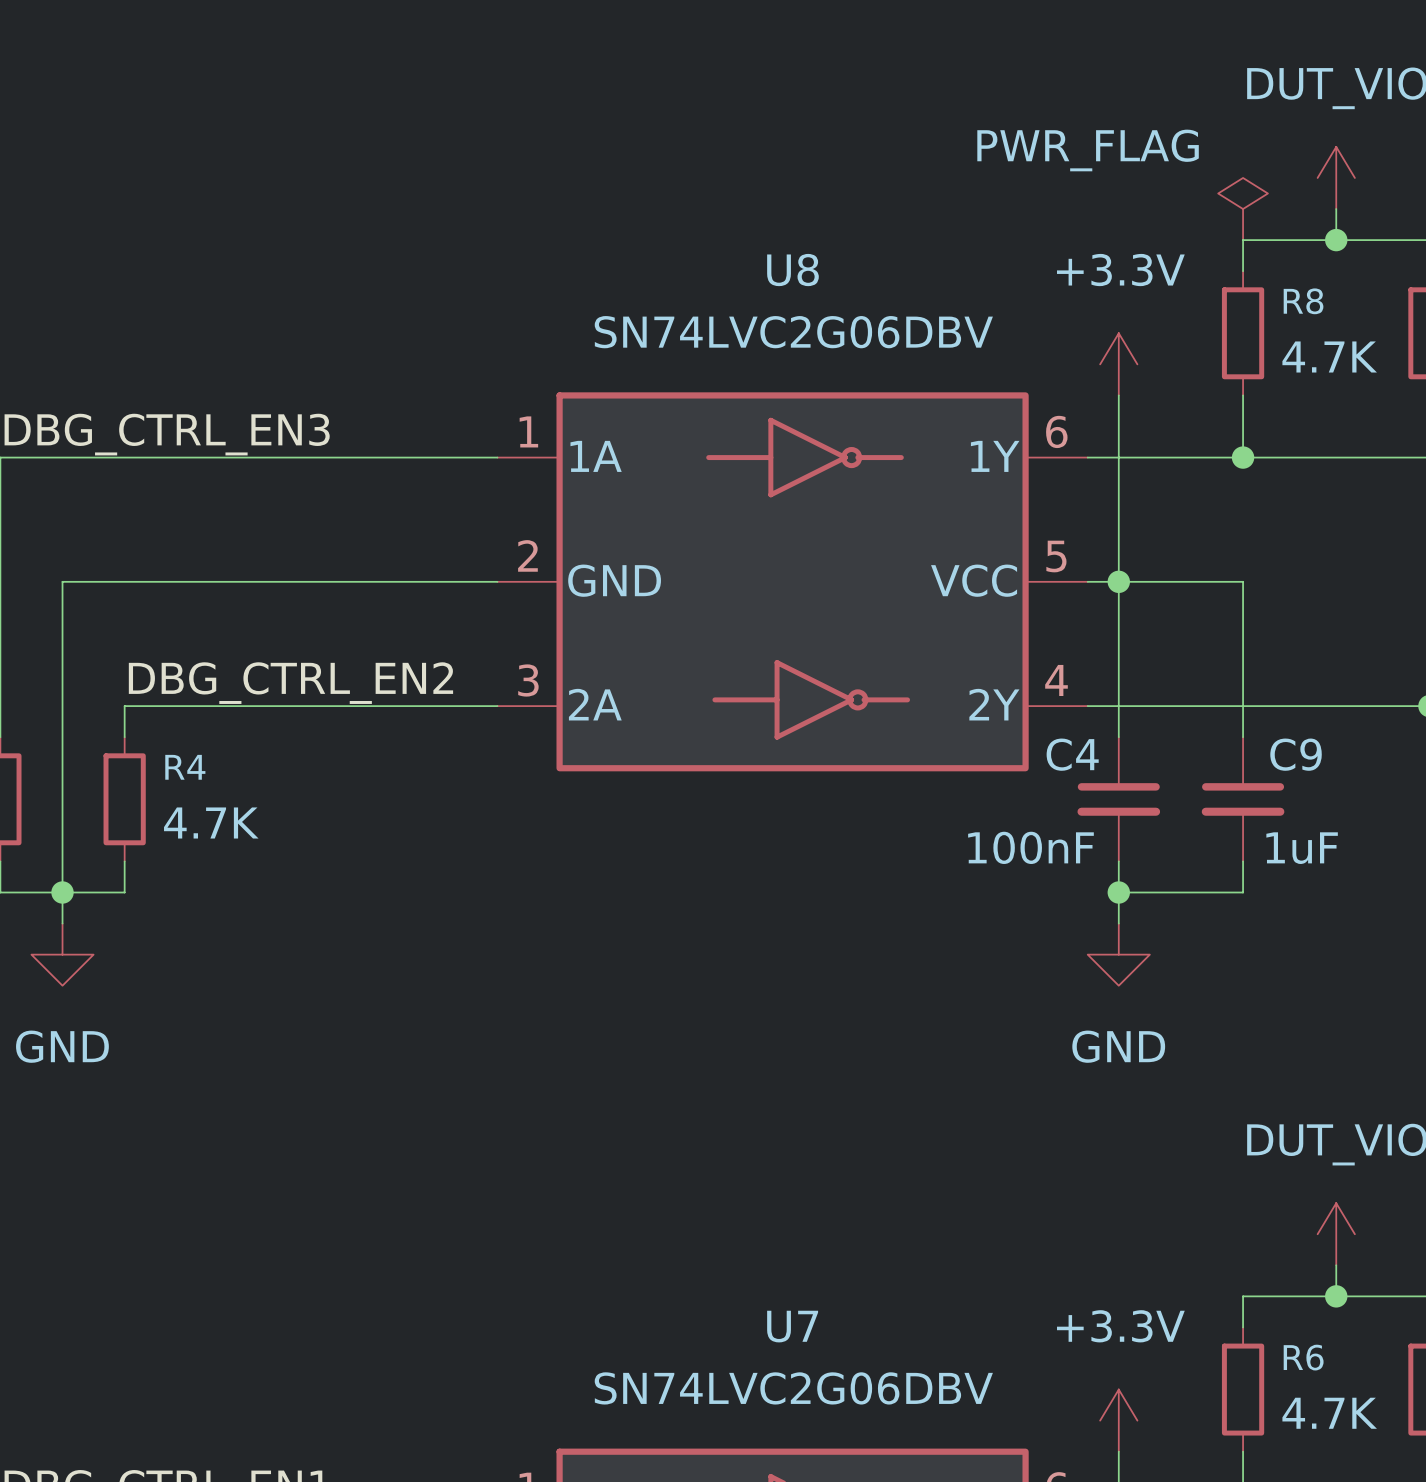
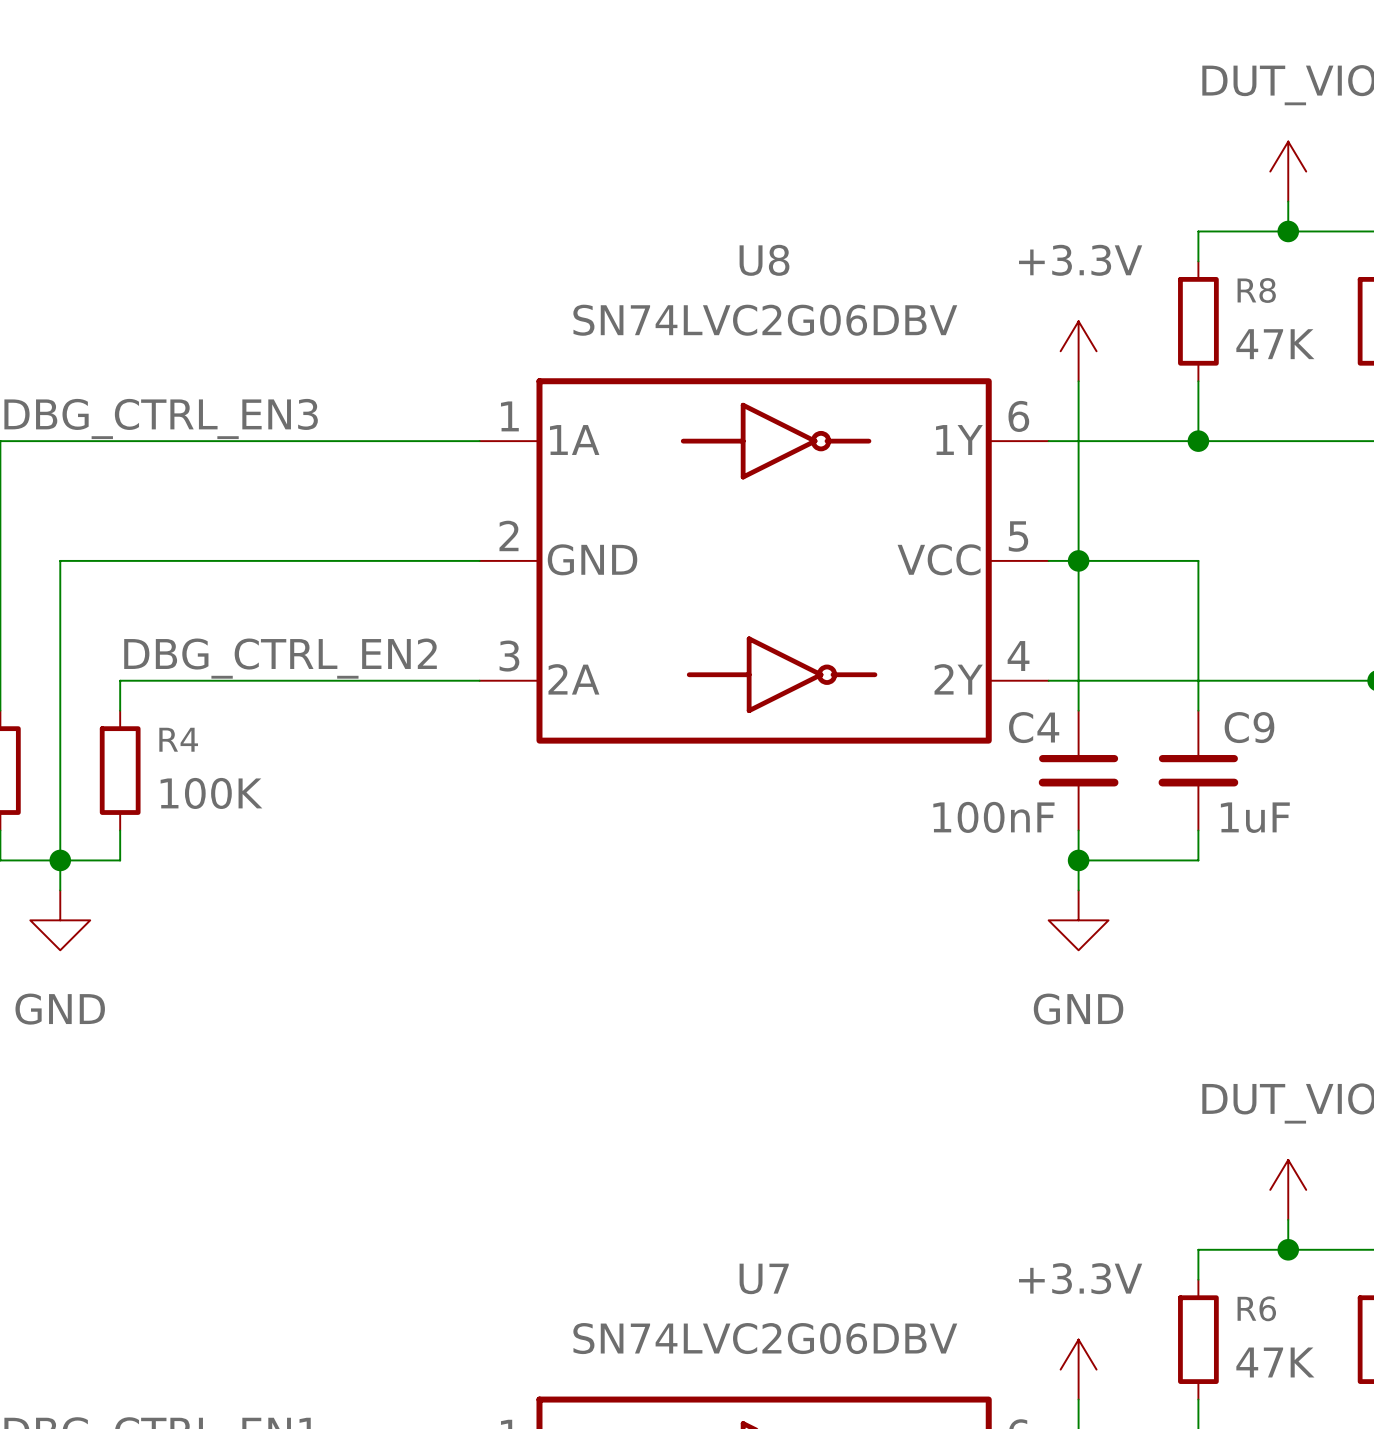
power symbol: PWR_FLAG (1243, 209) -> none
R8 value: 4.7K (1329, 356) -> 47K (1275, 344)
R4 value: 4.7K (211, 822) -> 100K (211, 793)
R6 value: 4.7K (1329, 1413) -> 47K (1275, 1362)

